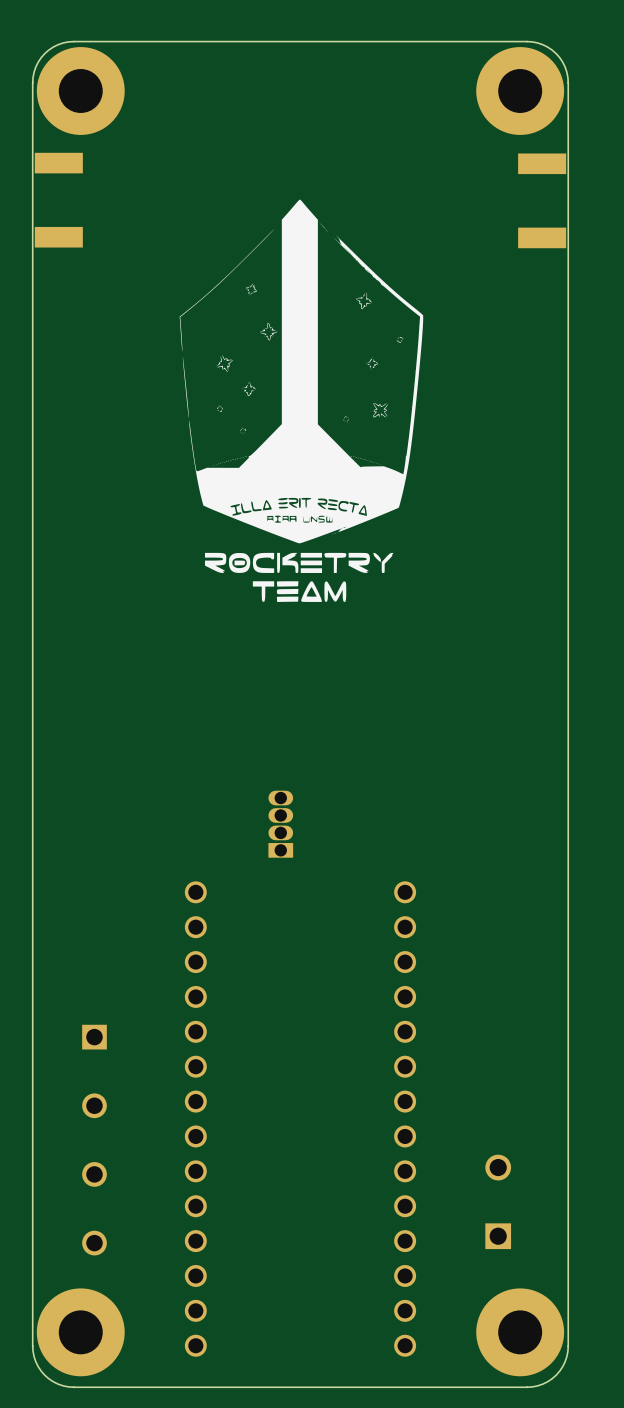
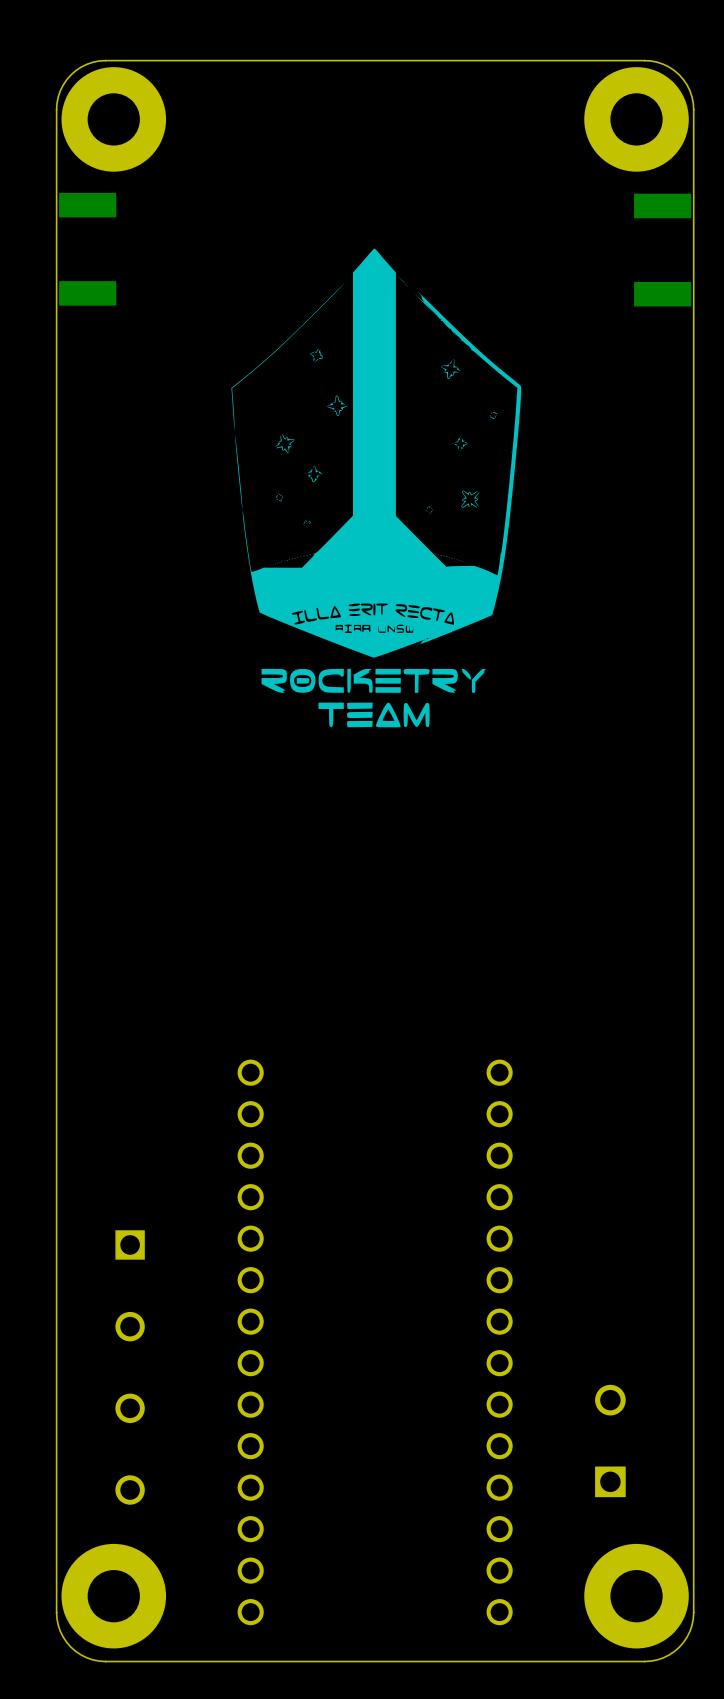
part: (280, 824) -> none

